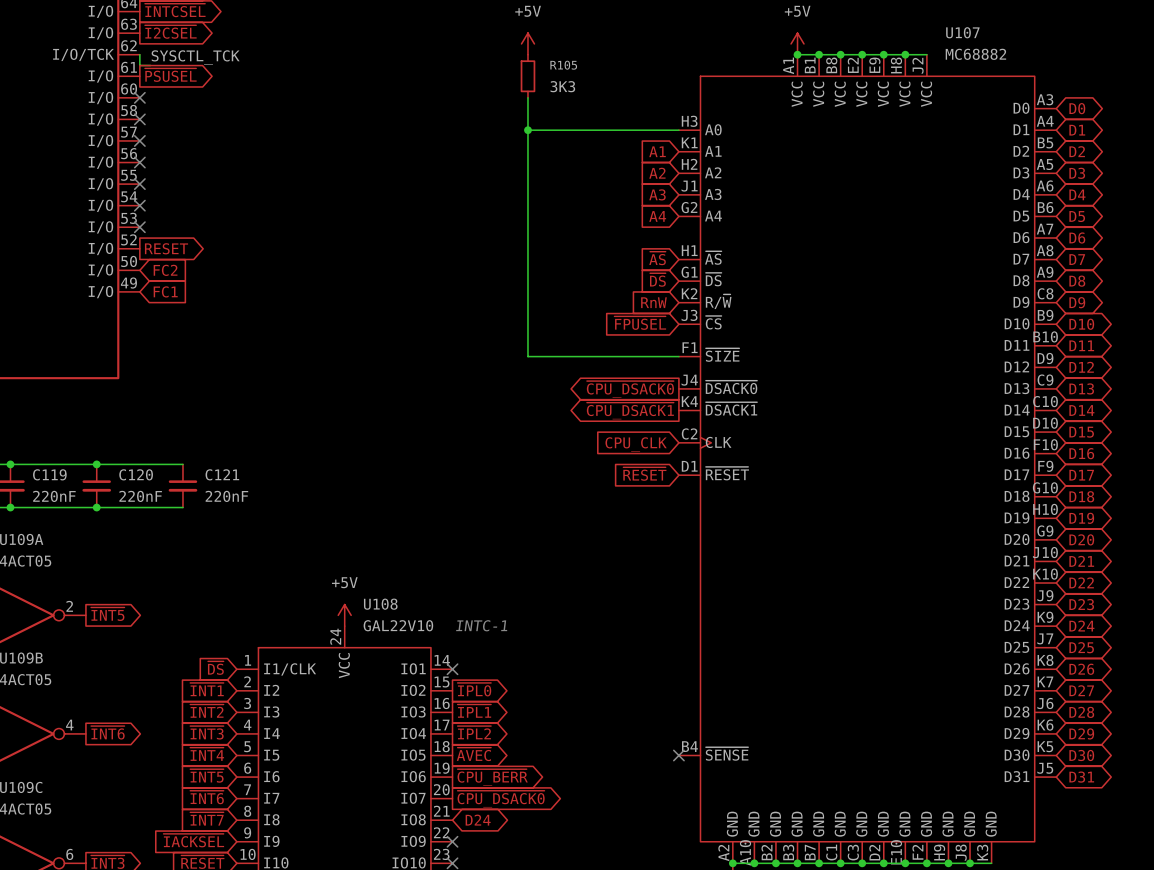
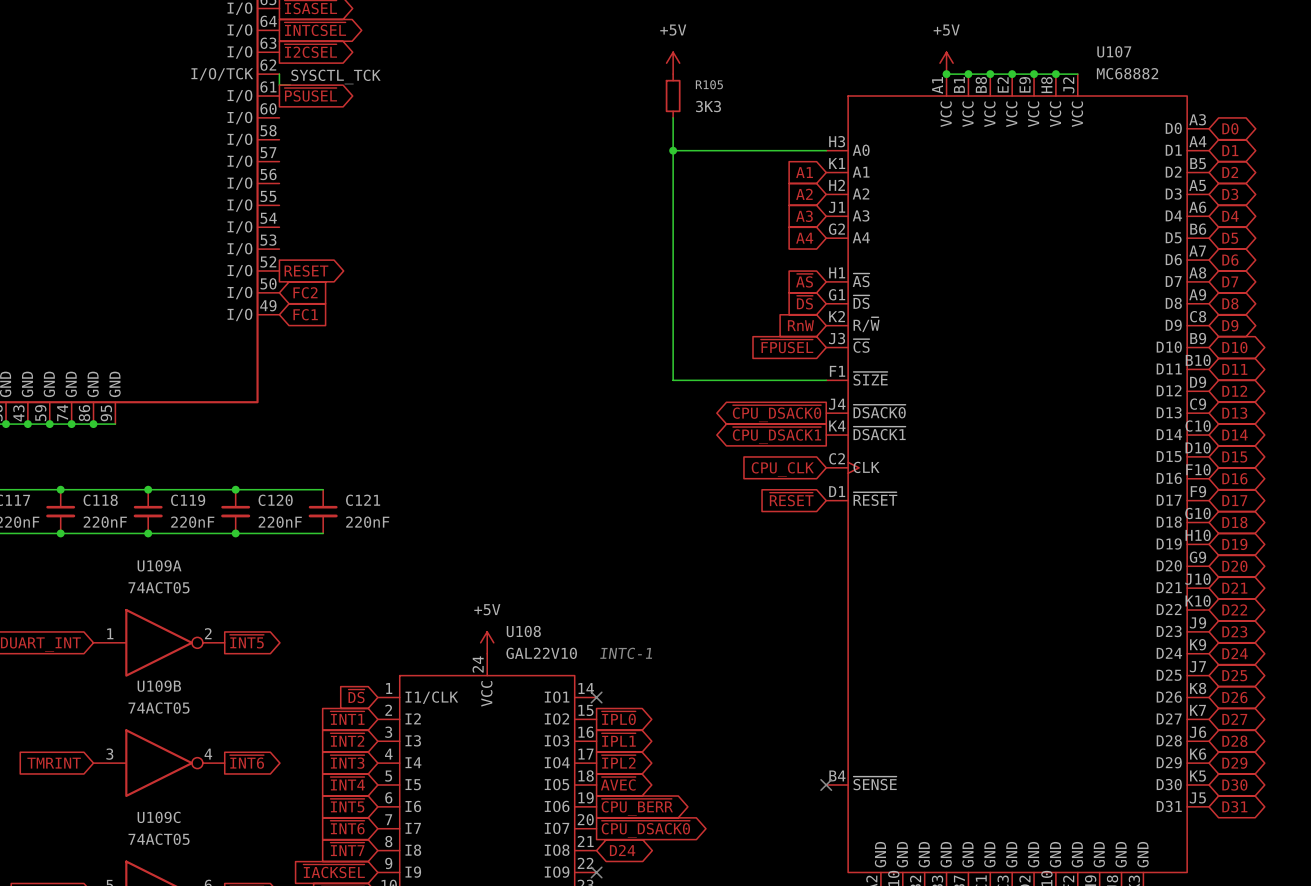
no-connect mark: (139, 97) -> none
no-connect mark: (139, 119) -> none
no-connect mark: (139, 140) -> none
no-connect mark: (139, 162) -> none
no-connect mark: (139, 184) -> none
no-connect mark: (139, 205) -> none
no-connect mark: (139, 227) -> none

